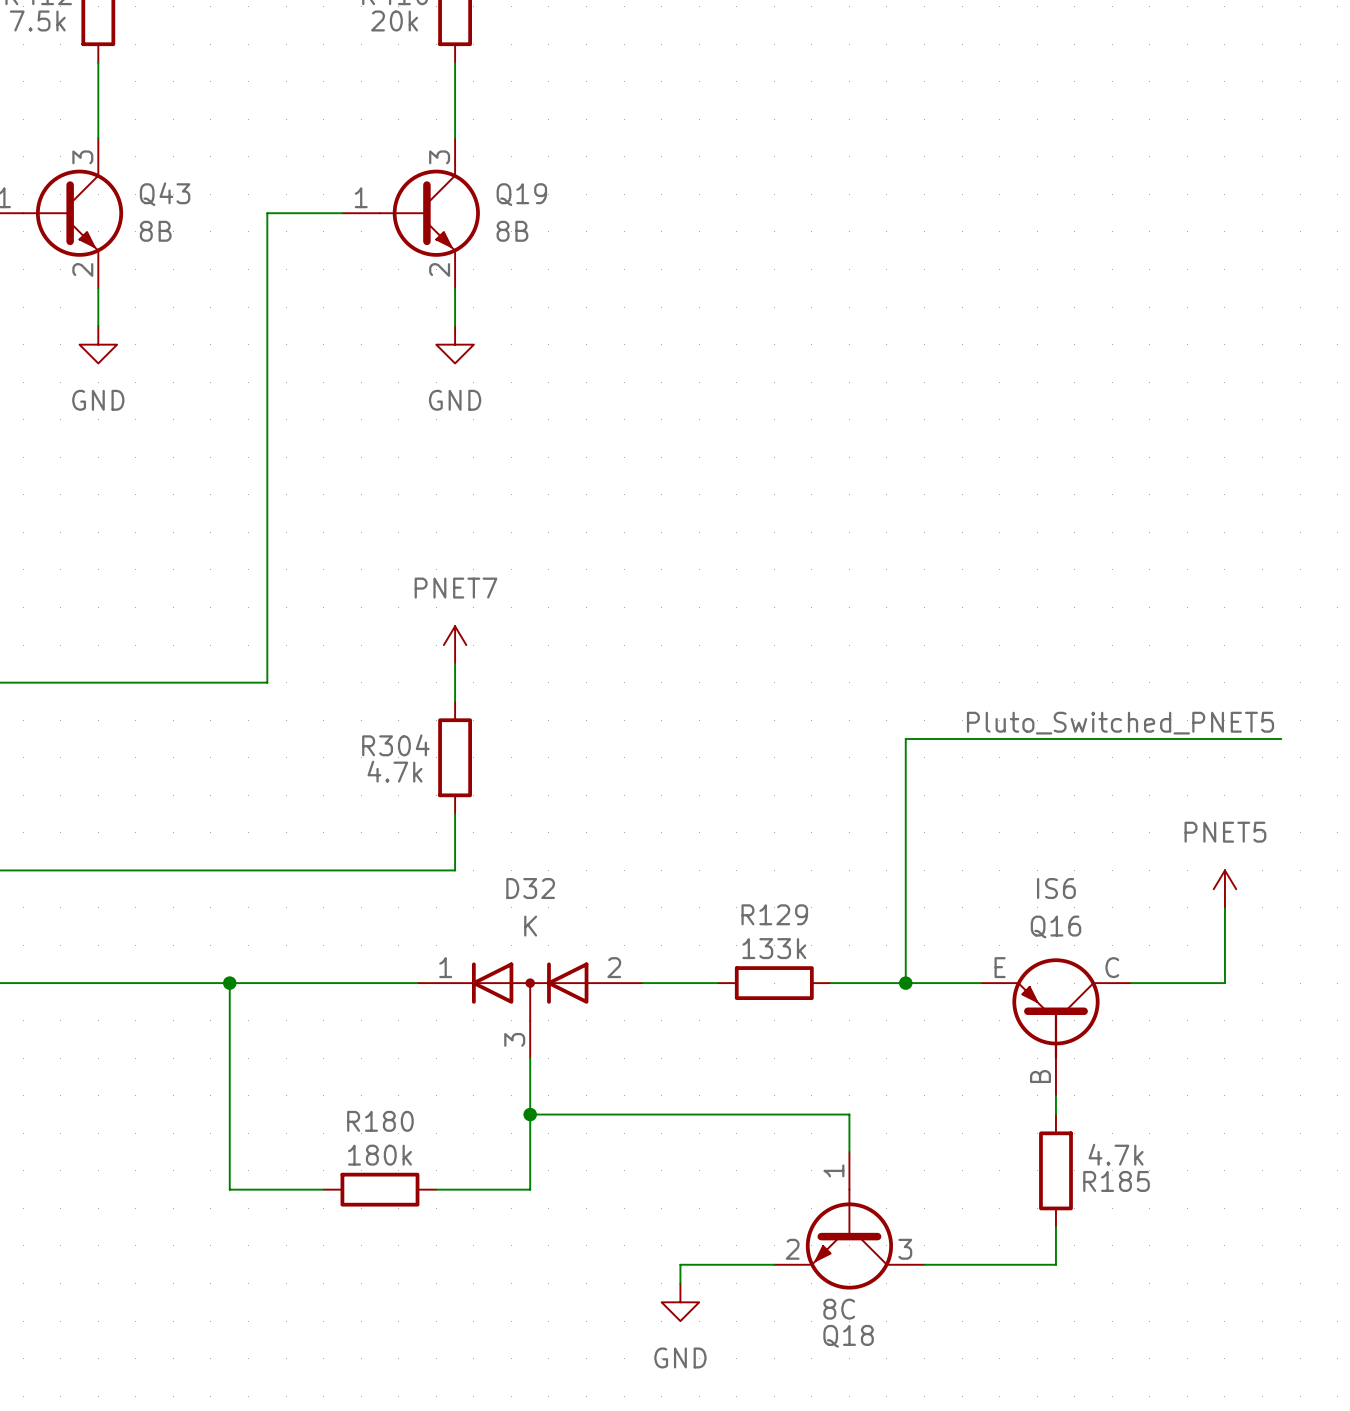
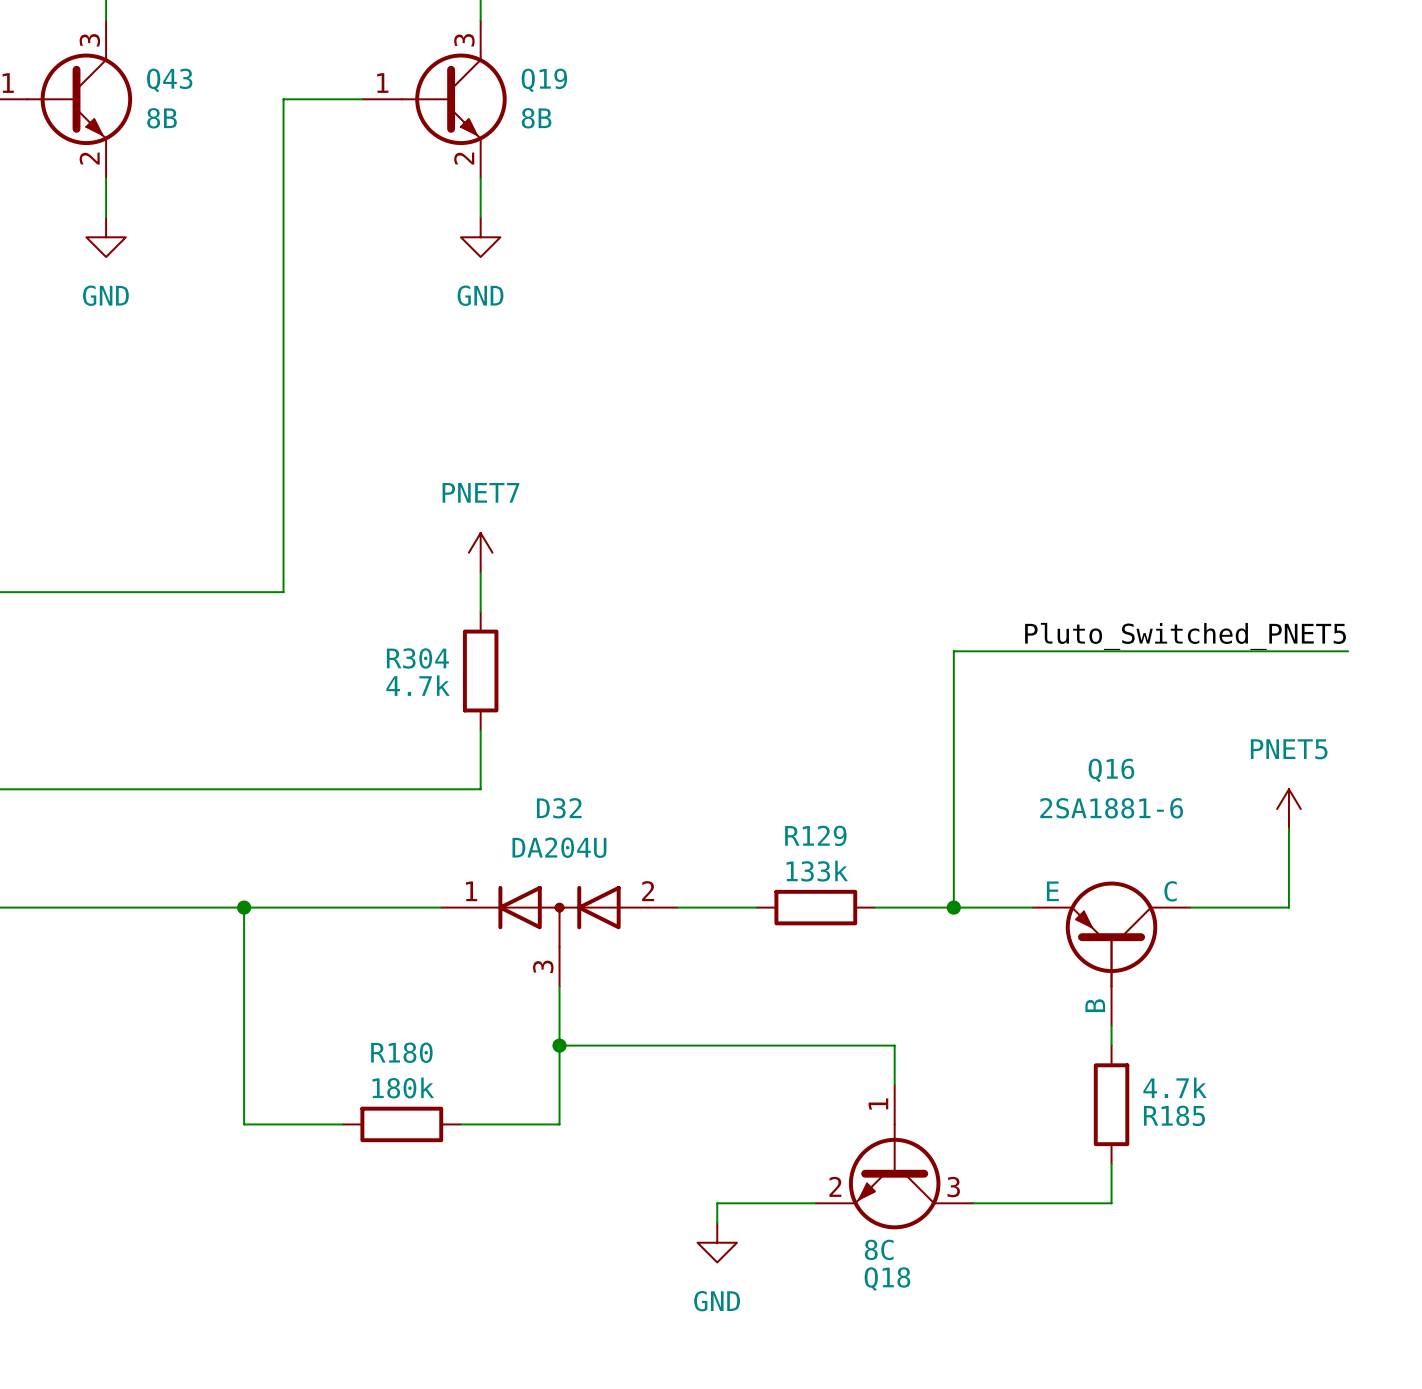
label position: Pluto_Switched_PNET5 (1120, 723) -> Pluto_Switched_PNET5 (1185, 636)
Q16 value: IS6 (1056, 888) -> 2SA1881-6 (1111, 808)
D32 value: K (530, 926) -> DA204U (559, 847)
Q16 name position: Q16 (1055, 926) -> Q16 (1111, 770)

